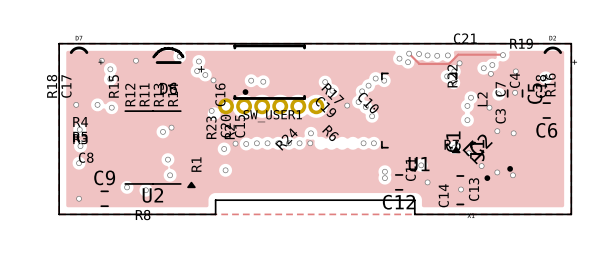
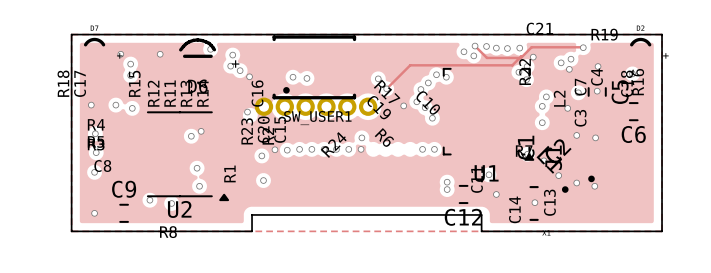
track: none -> (521, 56) (512, 65) (410, 65) (386, 88)

